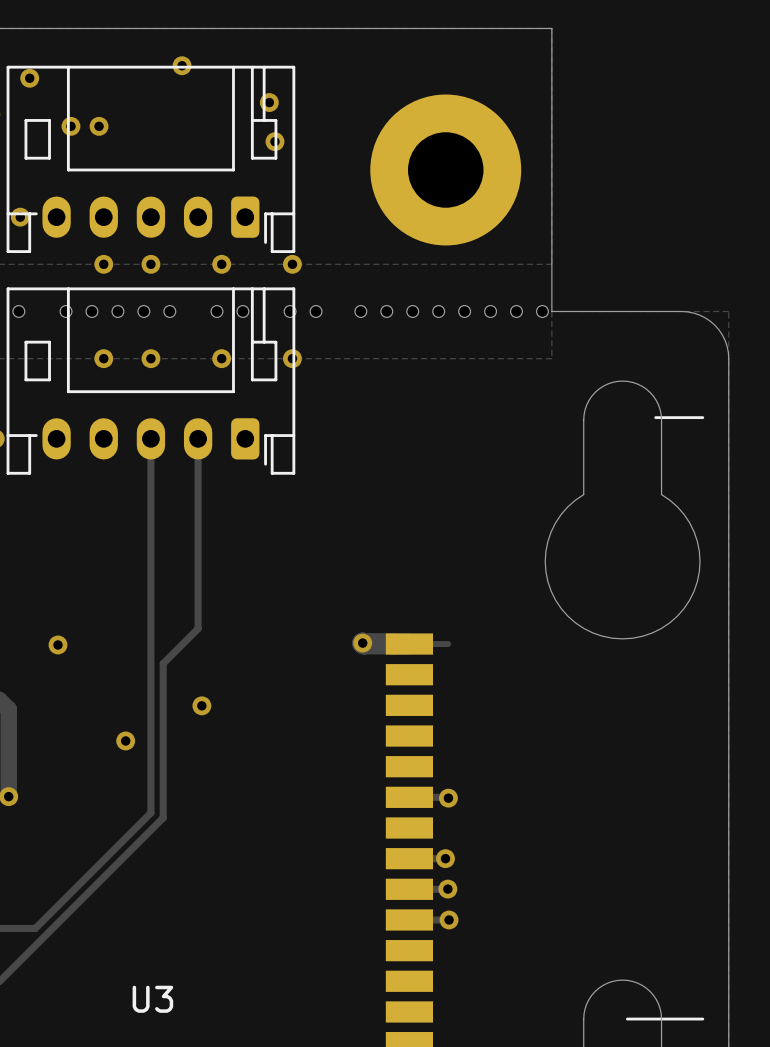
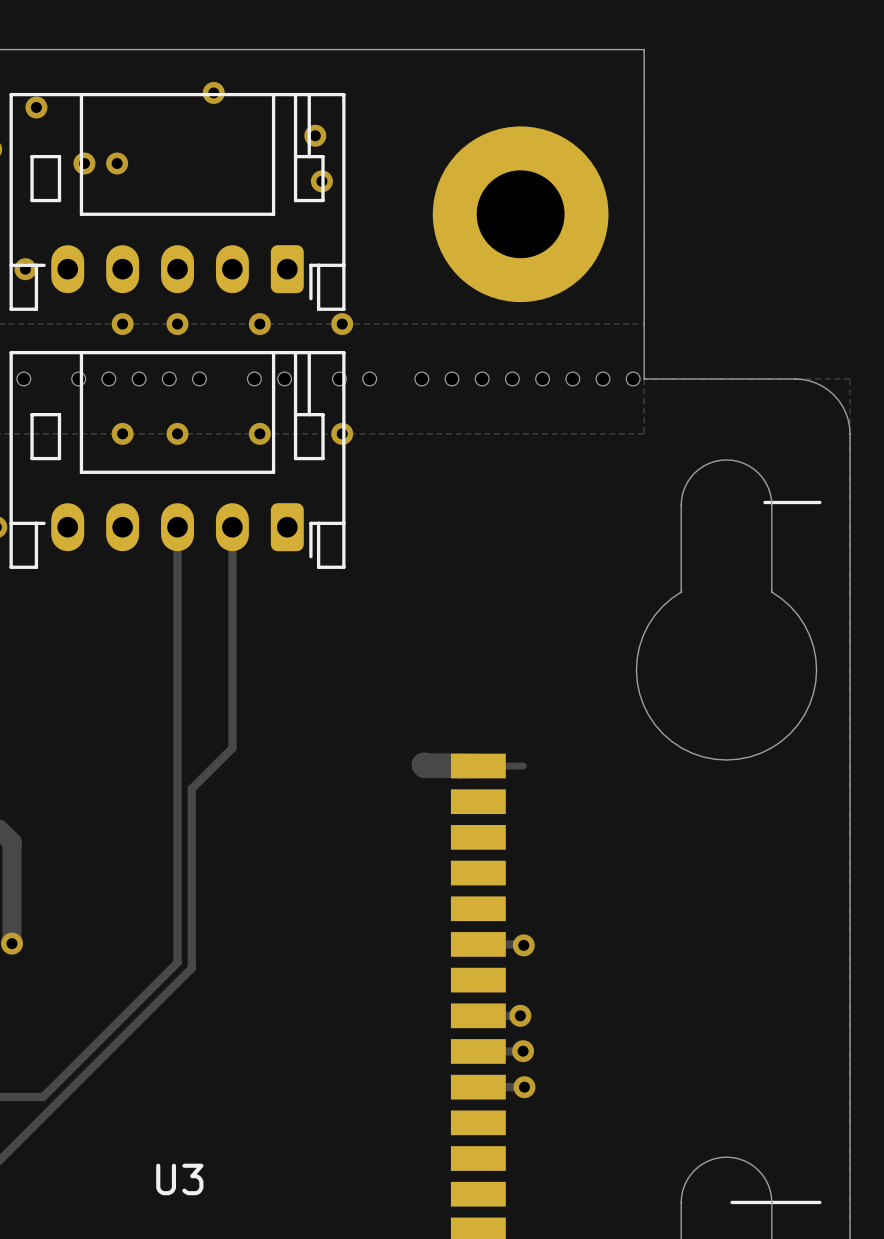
via: (362, 643) -> none
via: (58, 644) -> none
via: (201, 705) -> none
via: (125, 740) -> none

